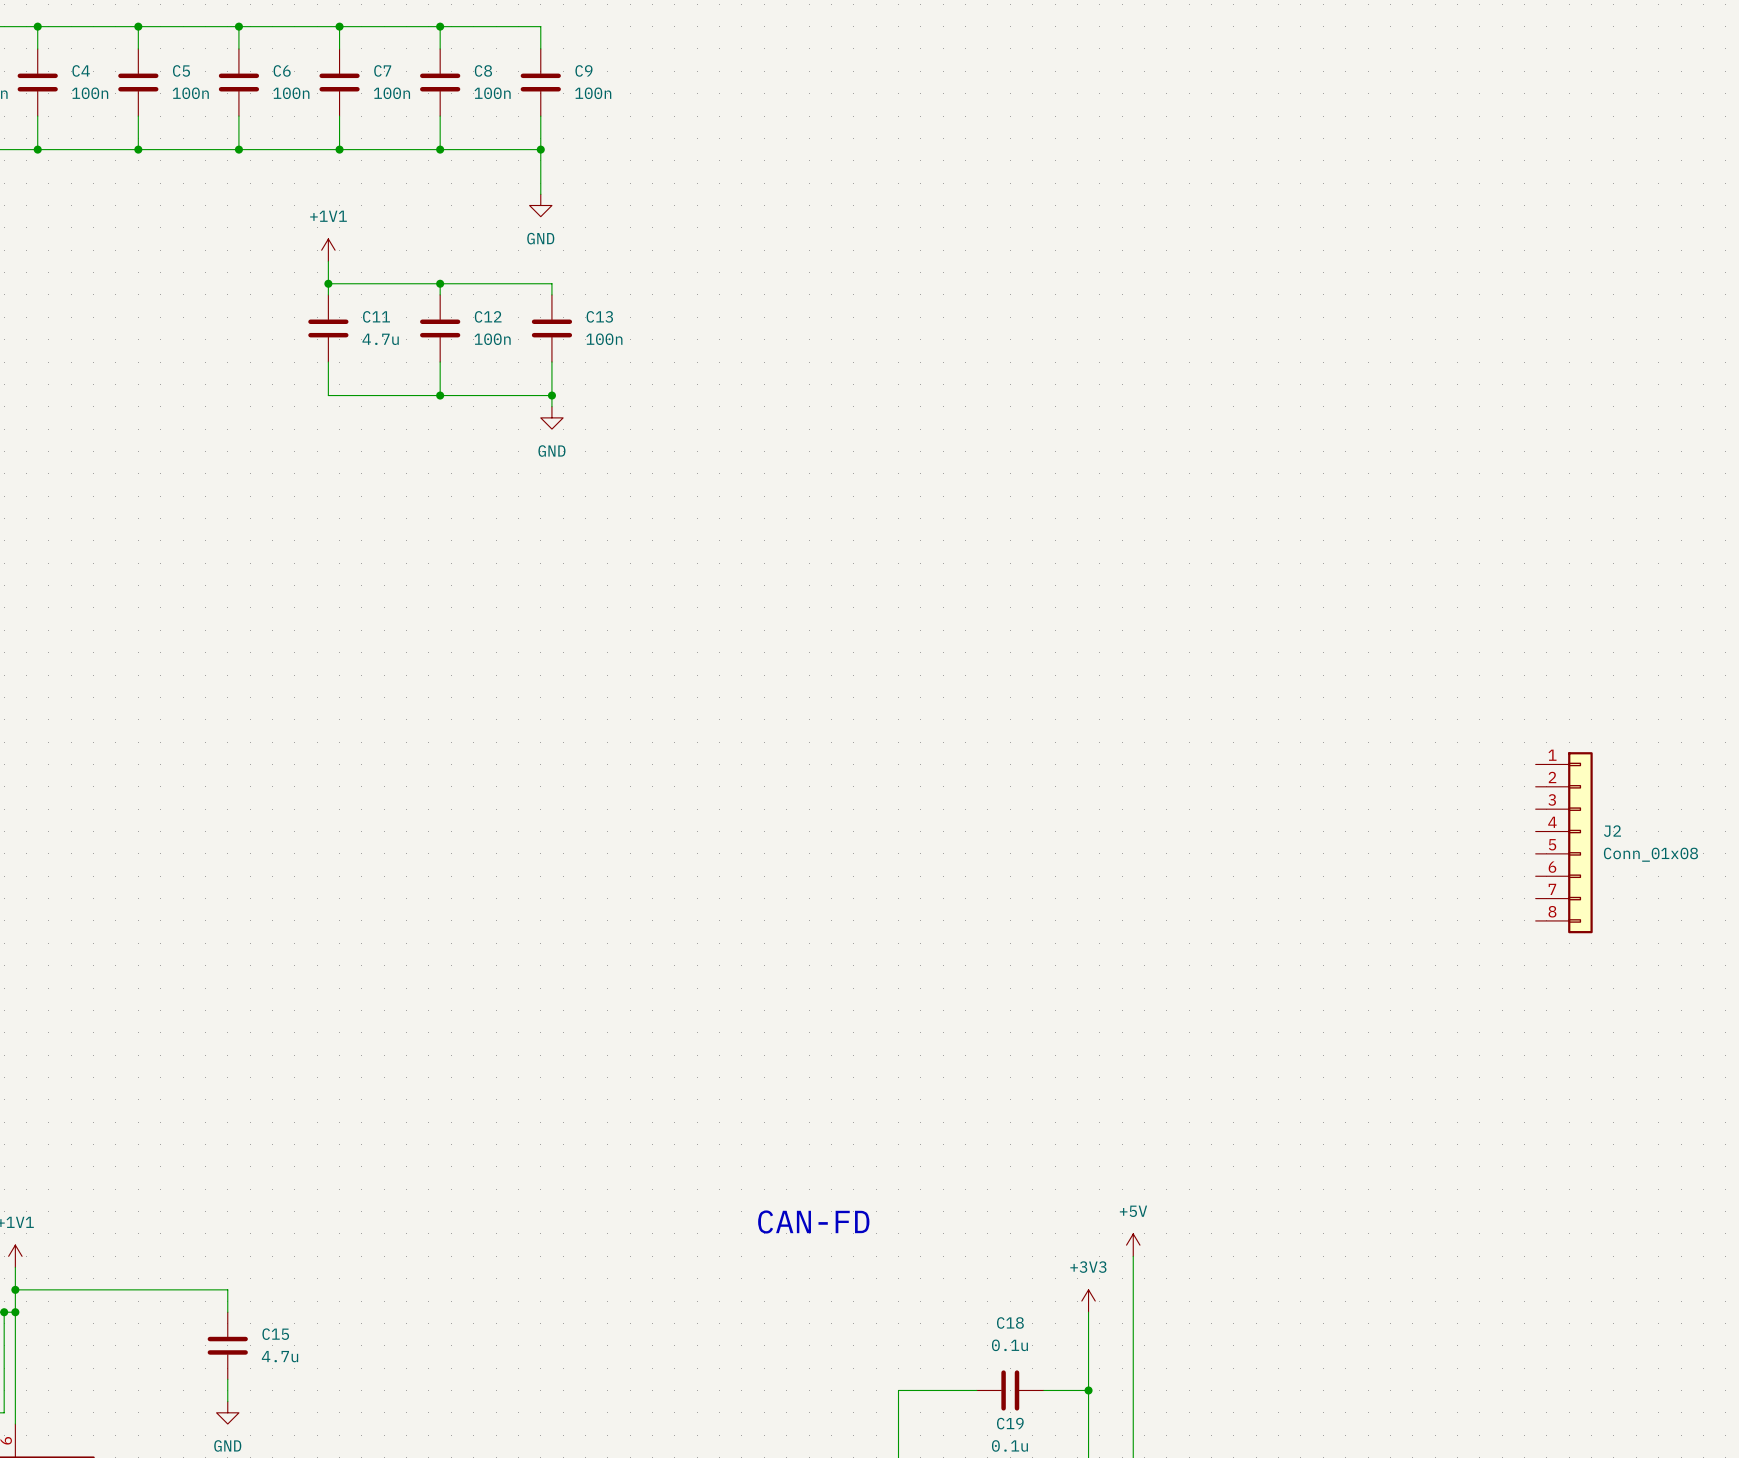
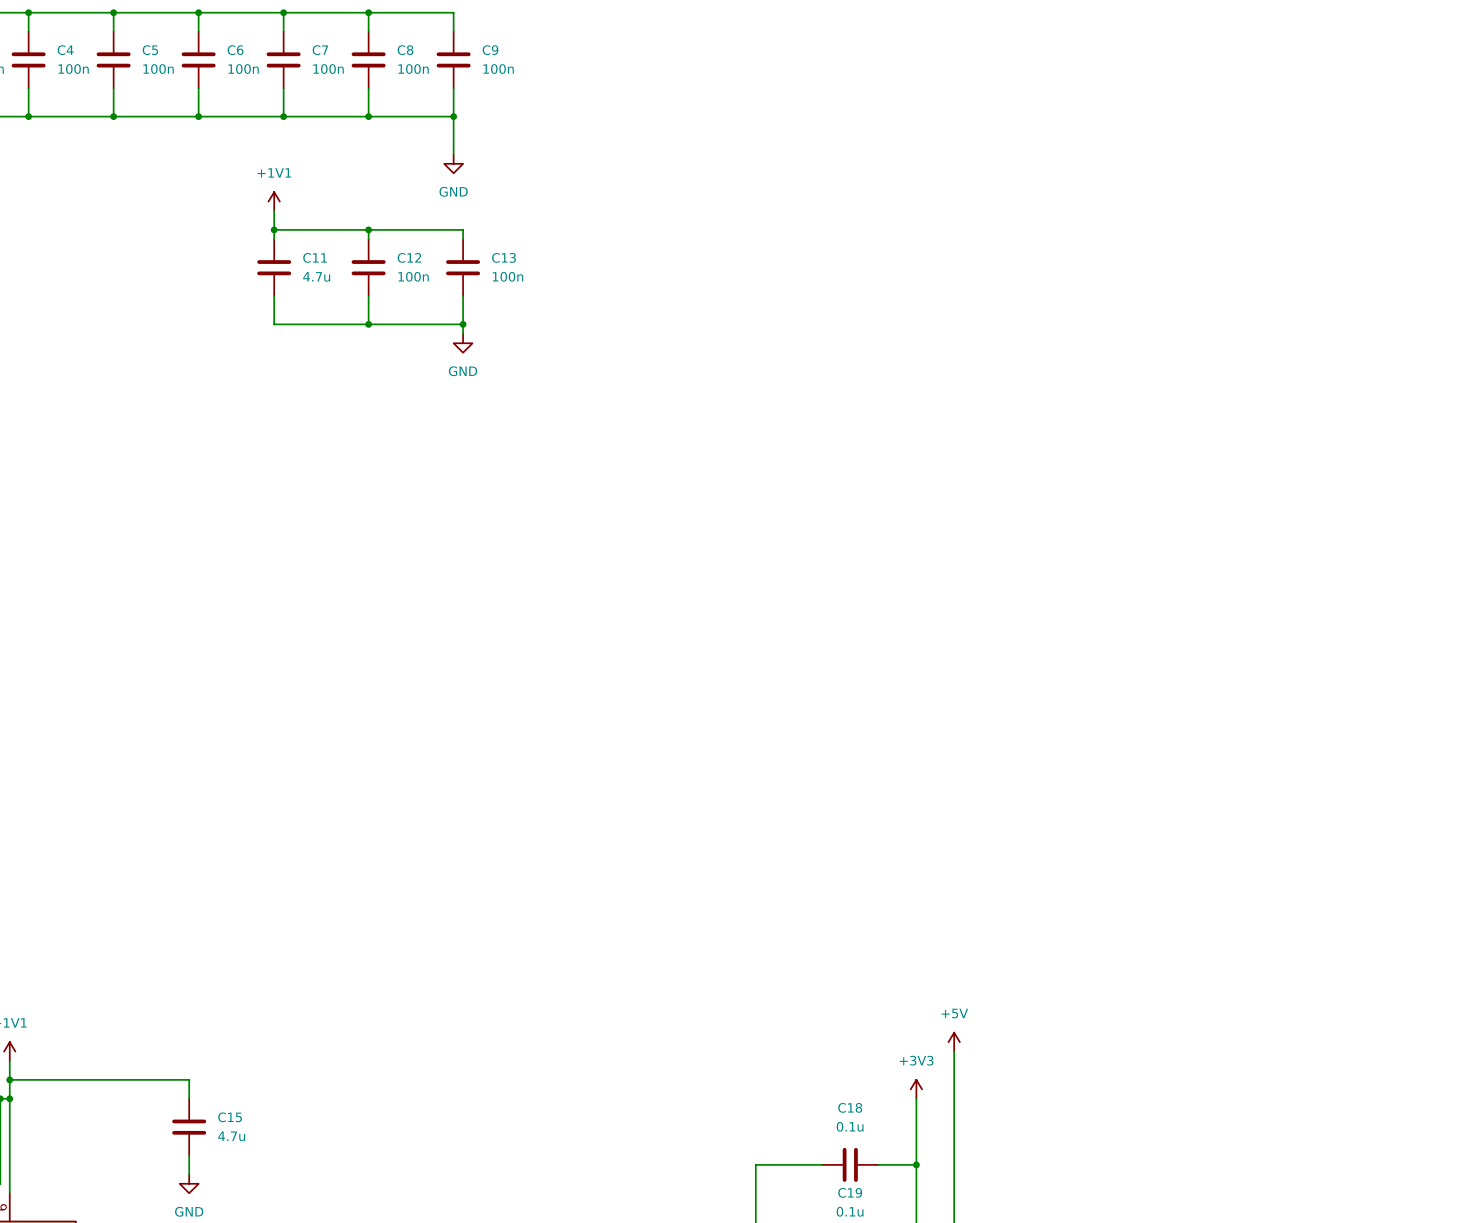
J2: Conn_01x08 (1564, 842) -> none
text: CAN-FD (813, 1221) -> none

